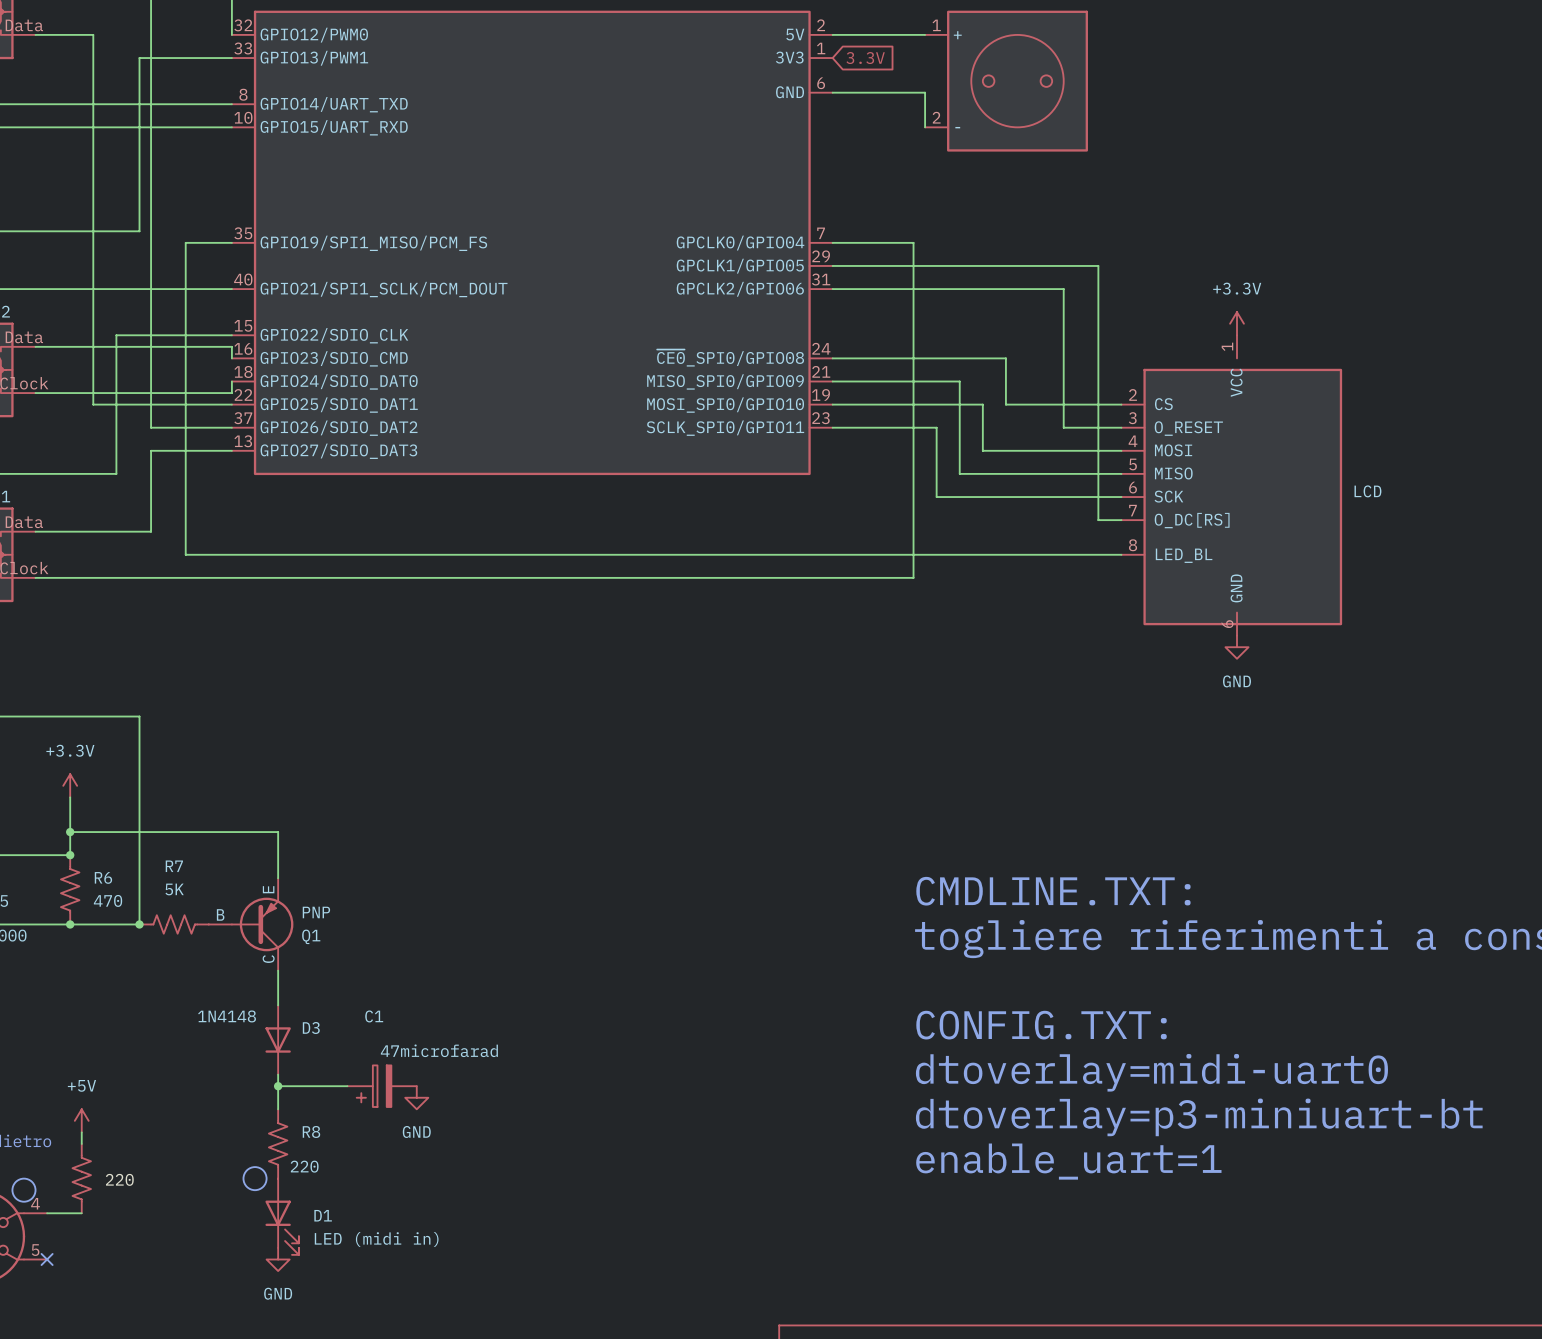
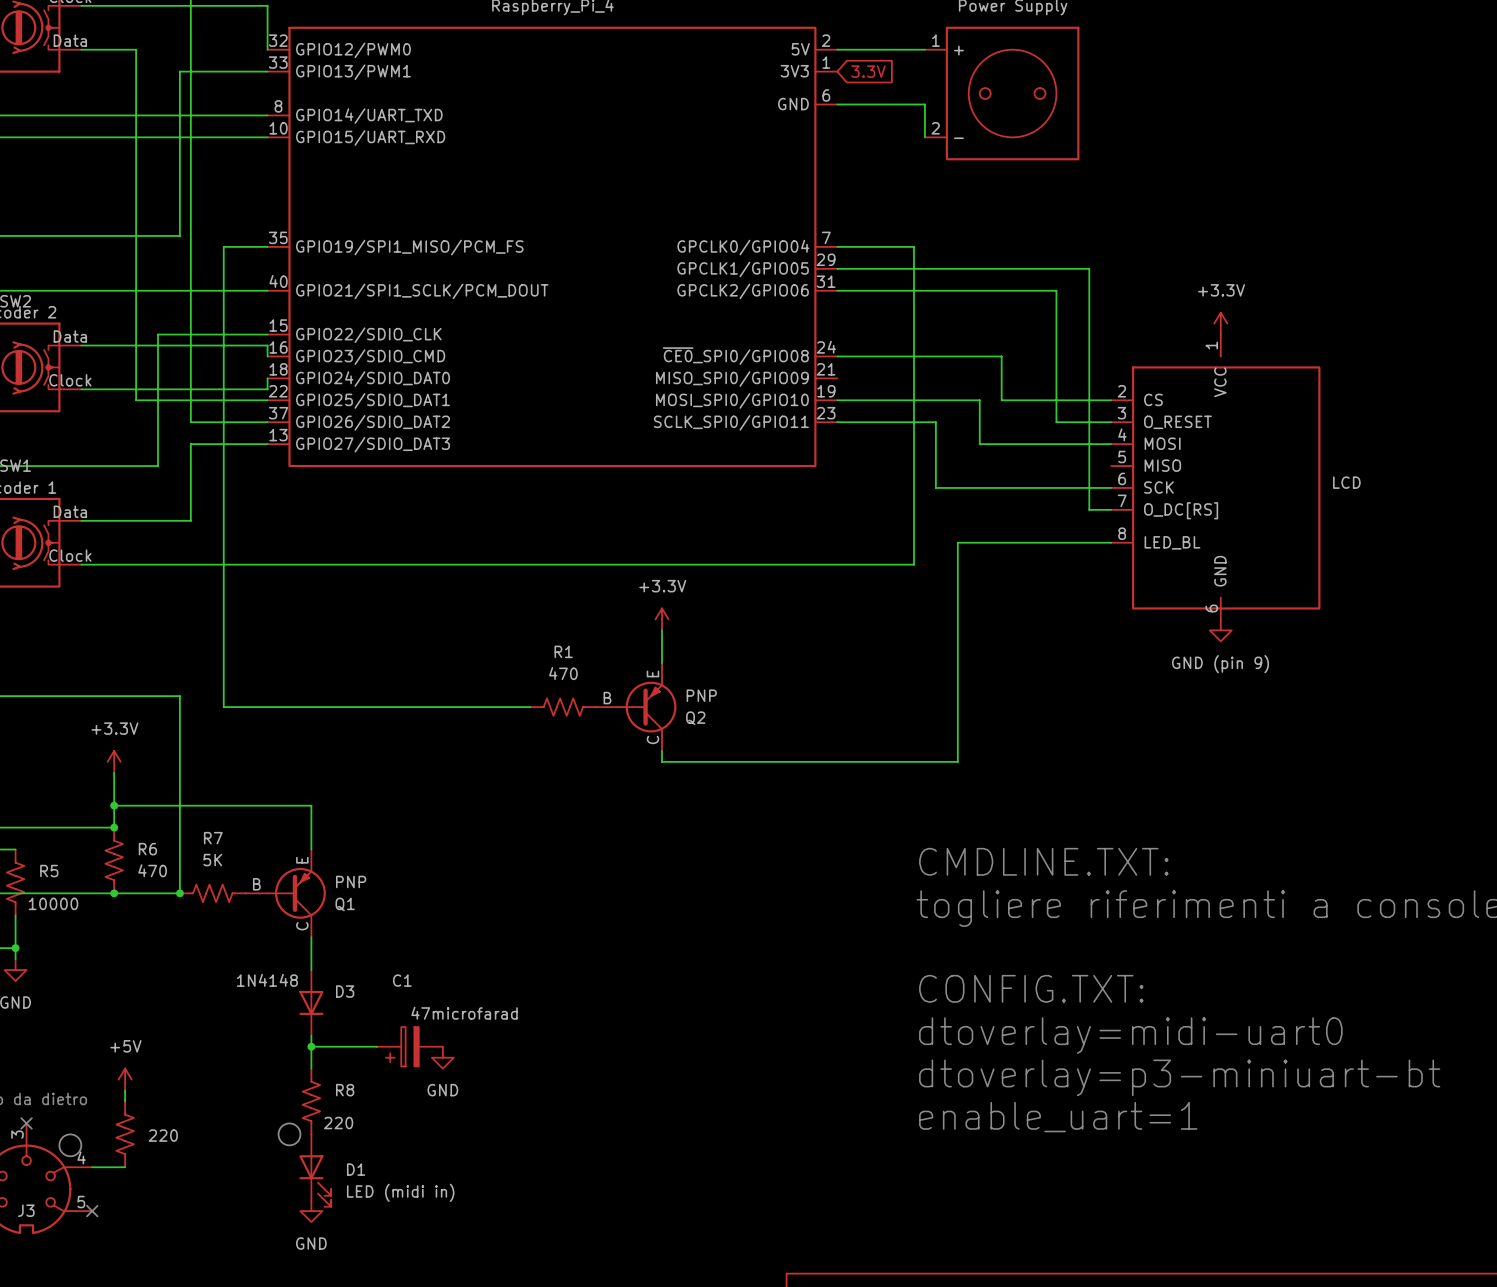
wire: (832, 381) (959, 381) (959, 473) (1121, 473) -> none
wire: (185, 554) (959, 554) -> (223, 542) (223, 707) (530, 707)
wire: none -> (957, 542) (957, 761) (662, 761) (662, 750)
power symbol: none -> +3.3V (662, 619)
wire: none -> (662, 630) (662, 663)
power symbol: GND (1237, 647) -> GND (pin 9) (1220, 630)
R1: none -> 470 (563, 707)
Q2: none -> PNP (636, 707)

